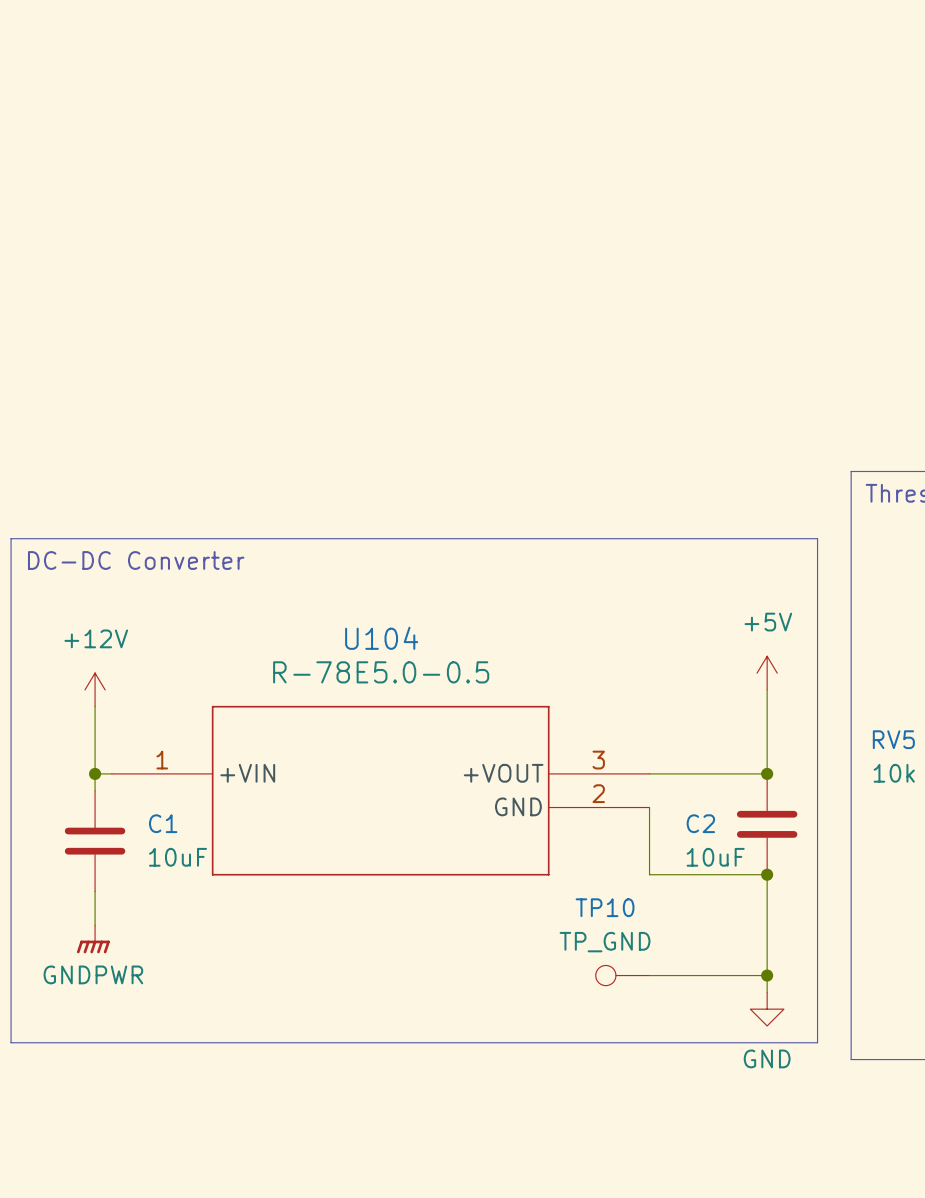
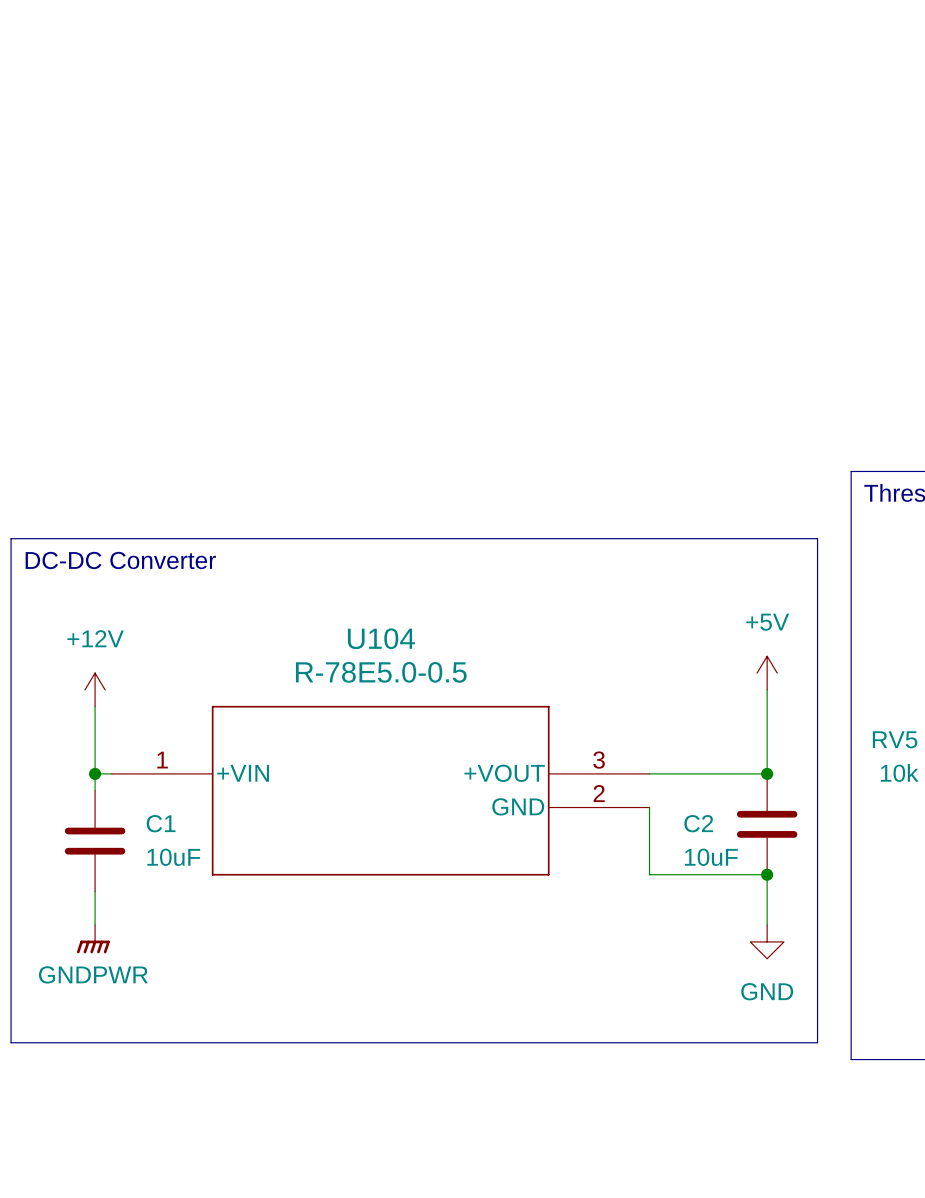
wire: (767, 925) (767, 992) -> none
TP10: TP_GND (622, 975) -> none
wire: (649, 975) (767, 975) -> none
junction: (767, 975) -> none
power symbol position: GND (767, 1009) -> GND (767, 941)

